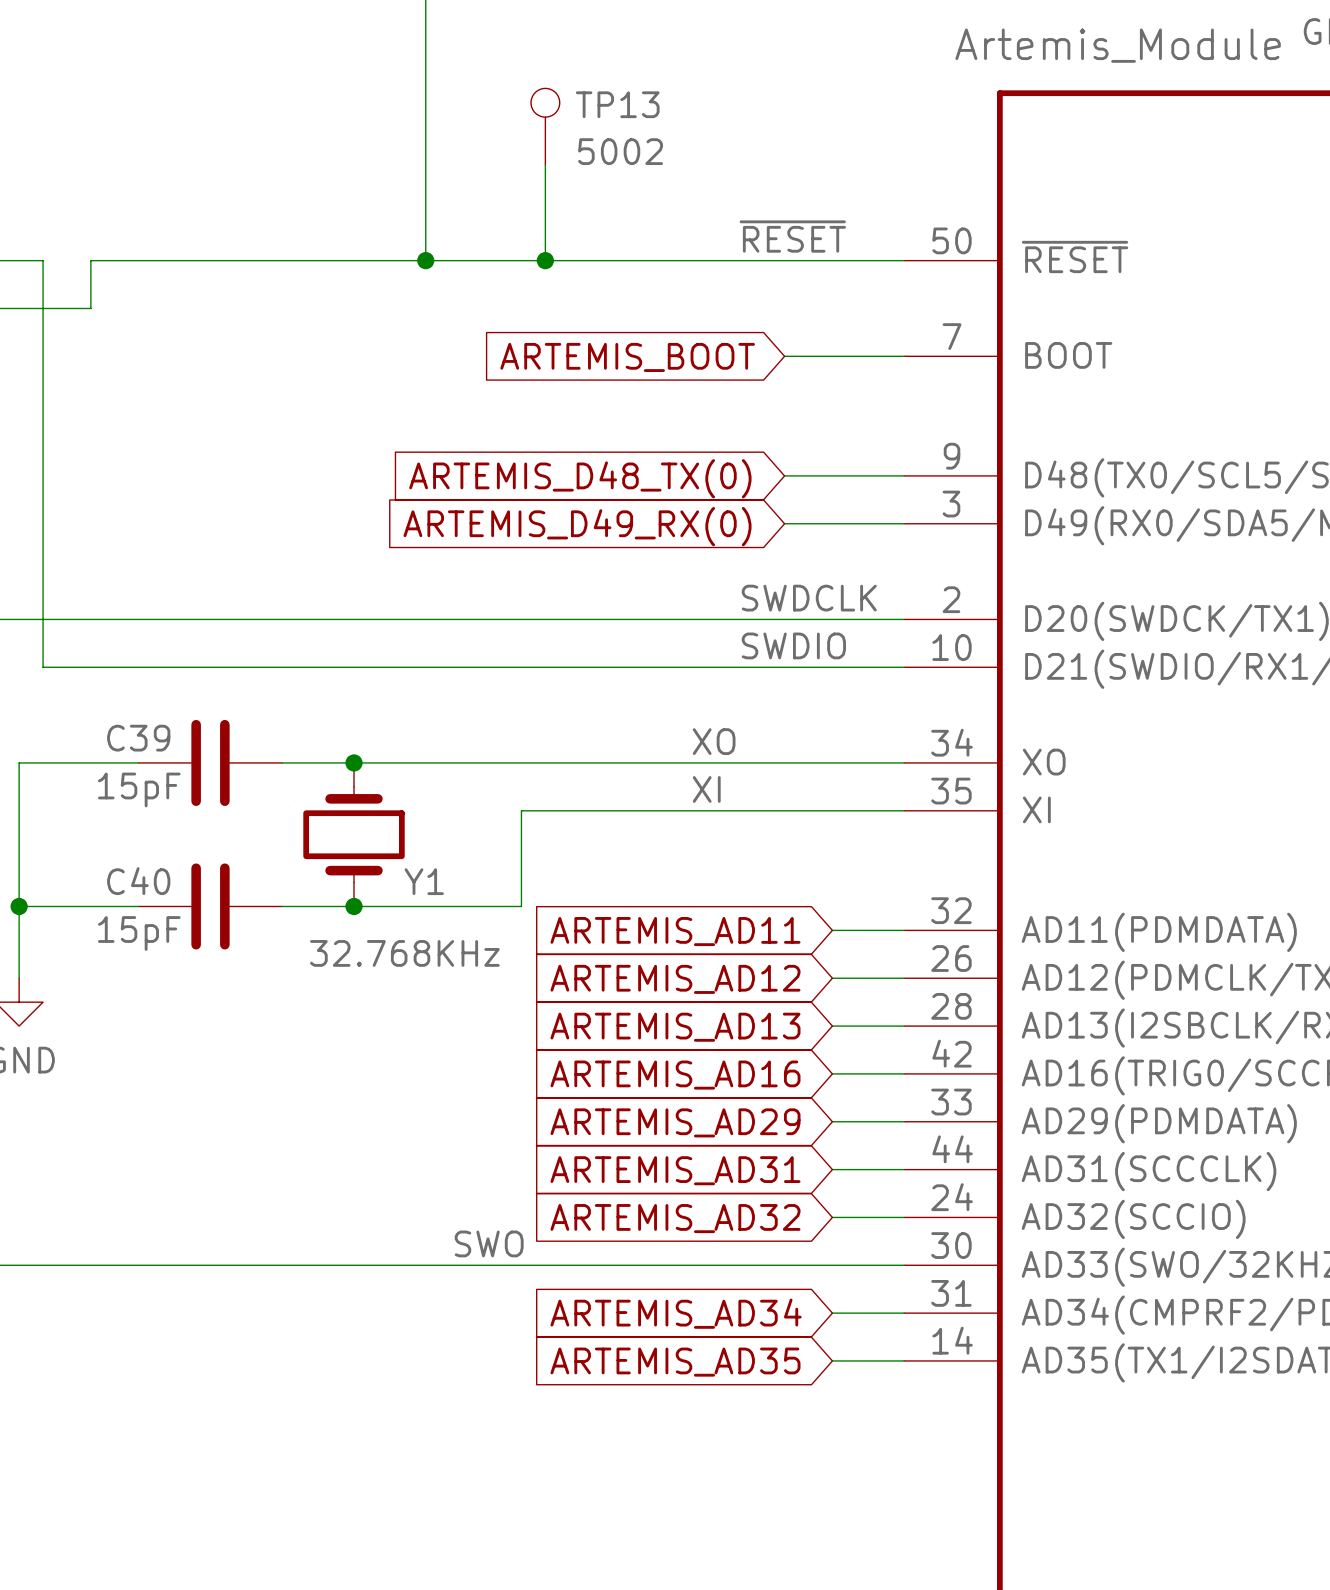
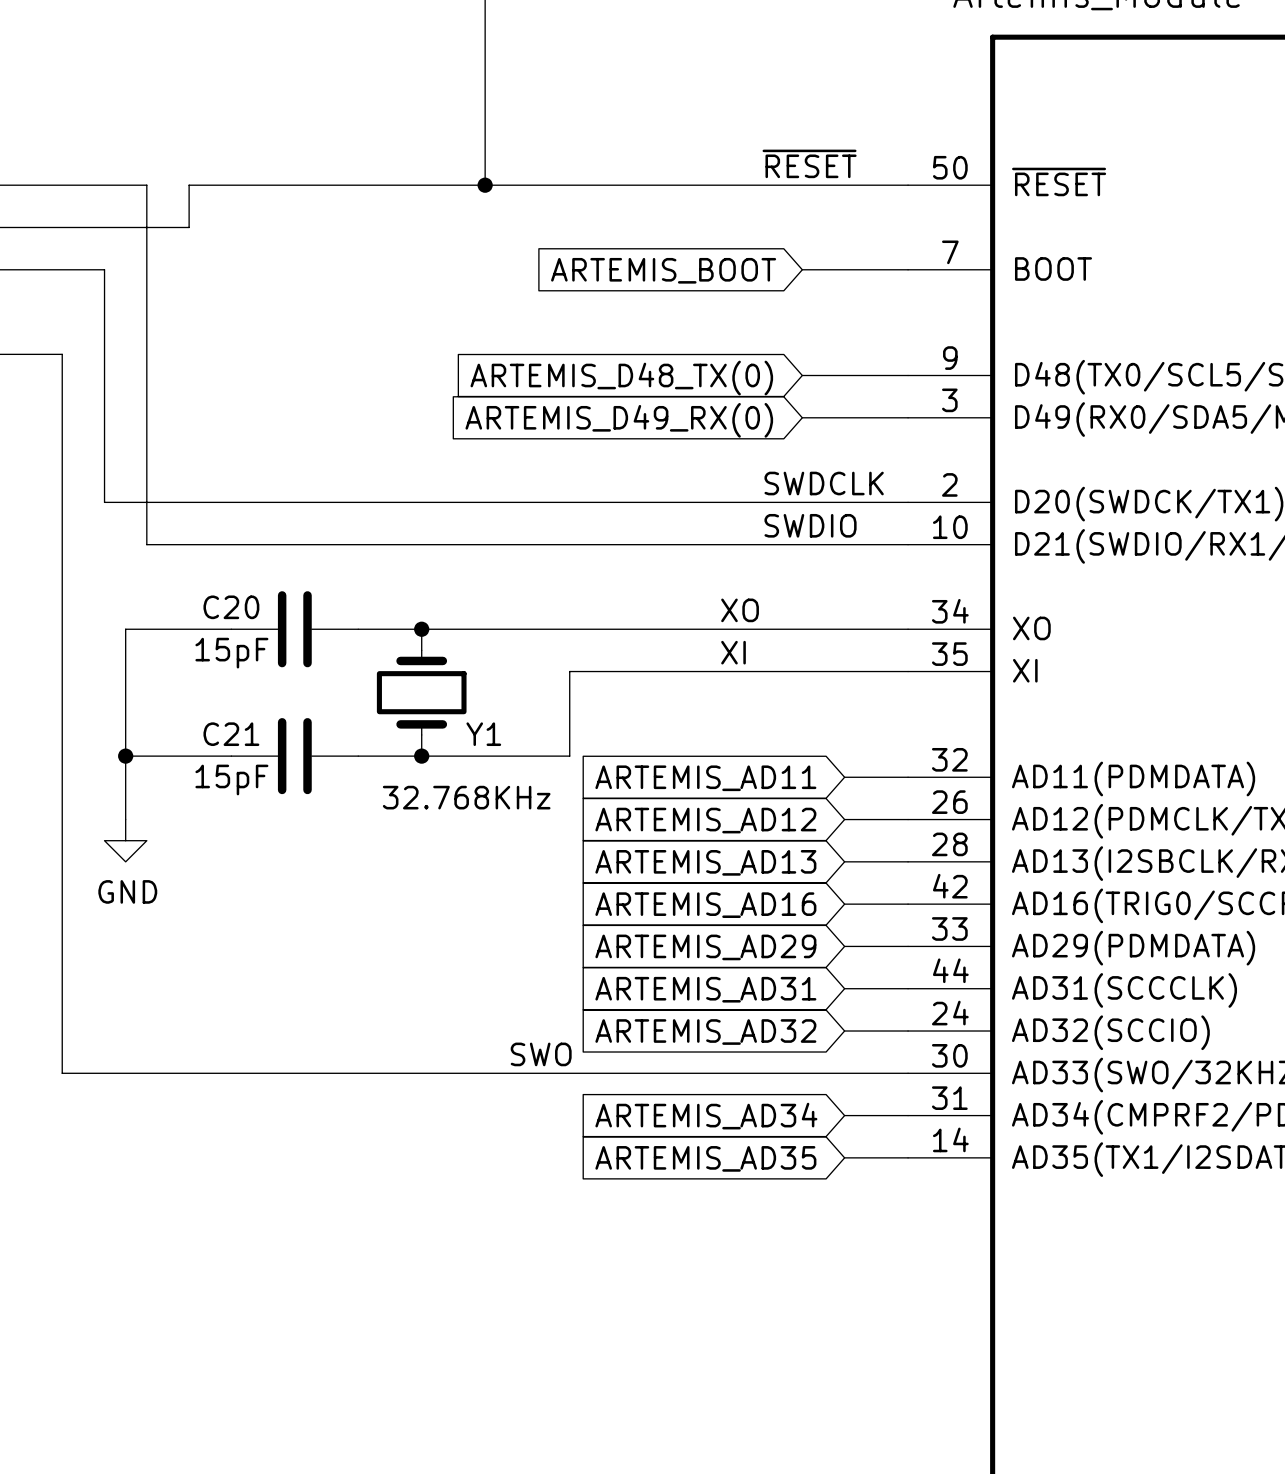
TP13: 5002 (545, 126) -> none
wire: (545, 164) (545, 260) -> none
junction: (545, 260) -> none
C39 name: C39 (138, 738) -> C20 (231, 607)
C40 name: C40 (138, 881) -> C21 (231, 734)

